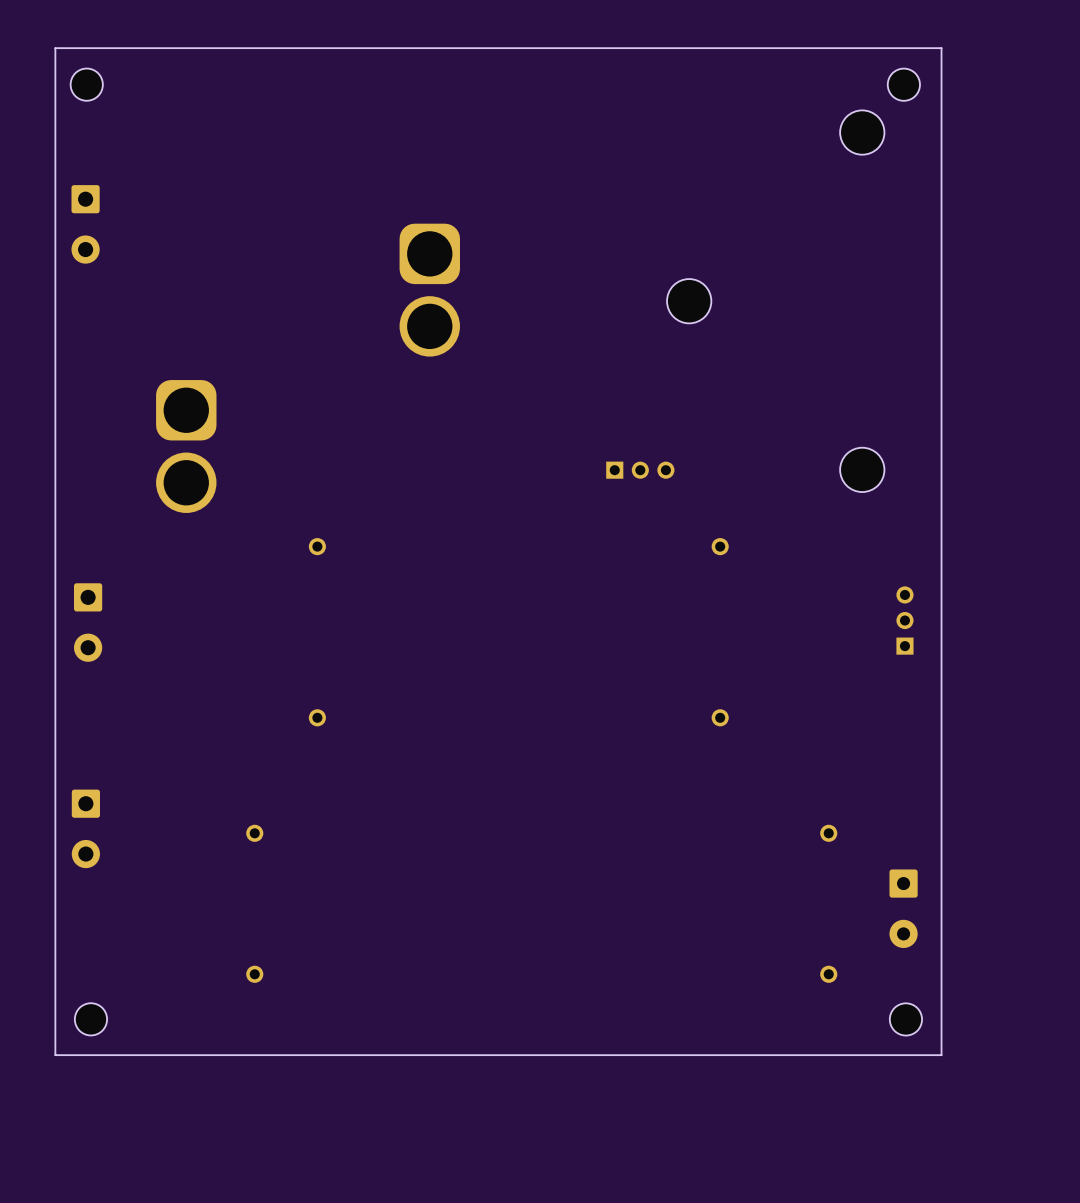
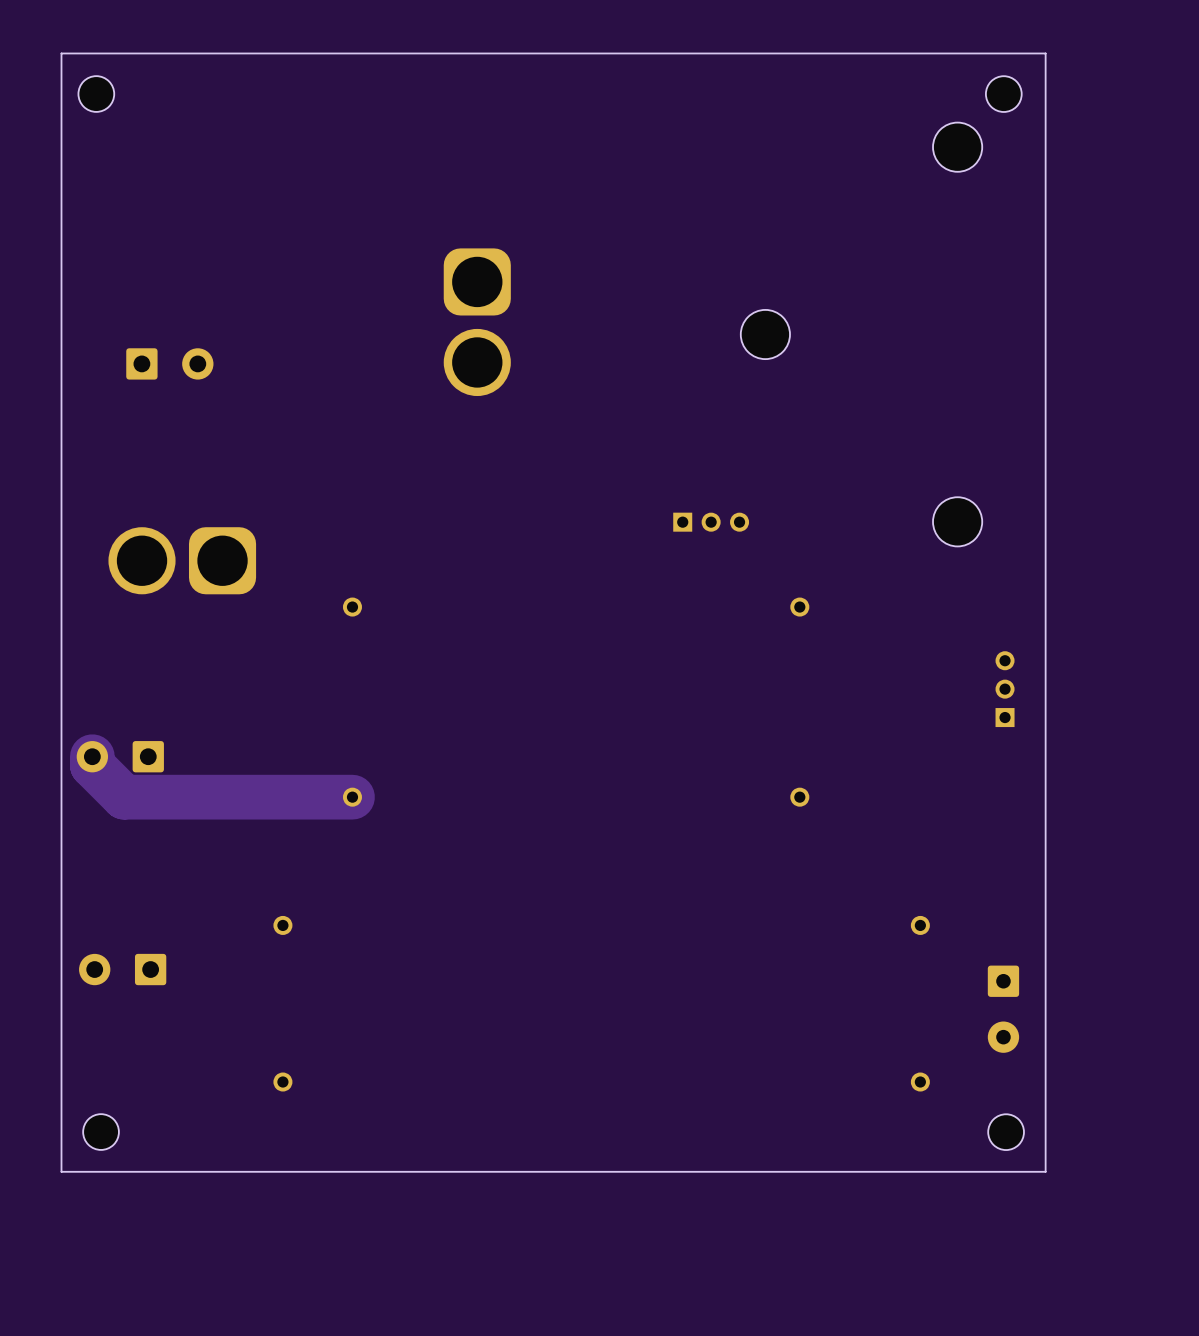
part rotation: 0° (85, 224) -> 90° counterclockwise (169, 363)
part position: (85, 224) -> (169, 363)
part rotation: 0° (186, 446) -> 90° clockwise (182, 560)
part rotation: 0° (88, 622) -> 90° clockwise (120, 756)
part position: (88, 622) -> (120, 756)
track: none -> (92, 756) (92, 765) (124, 797) (352, 797)
part rotation: 0° (85, 828) -> 90° clockwise (122, 969)
part position: (85, 828) -> (122, 969)

